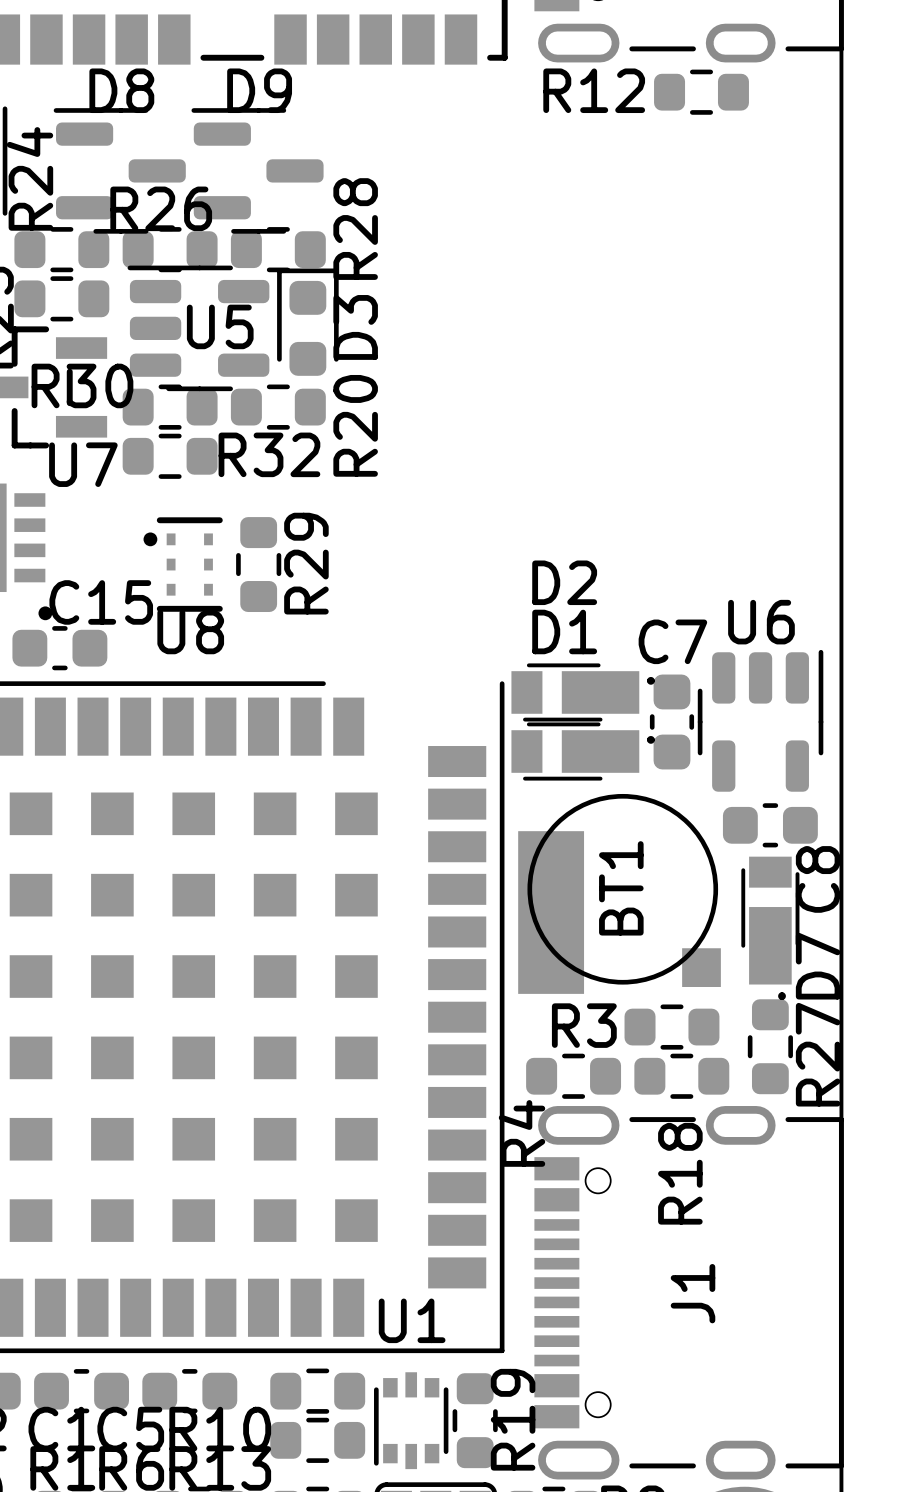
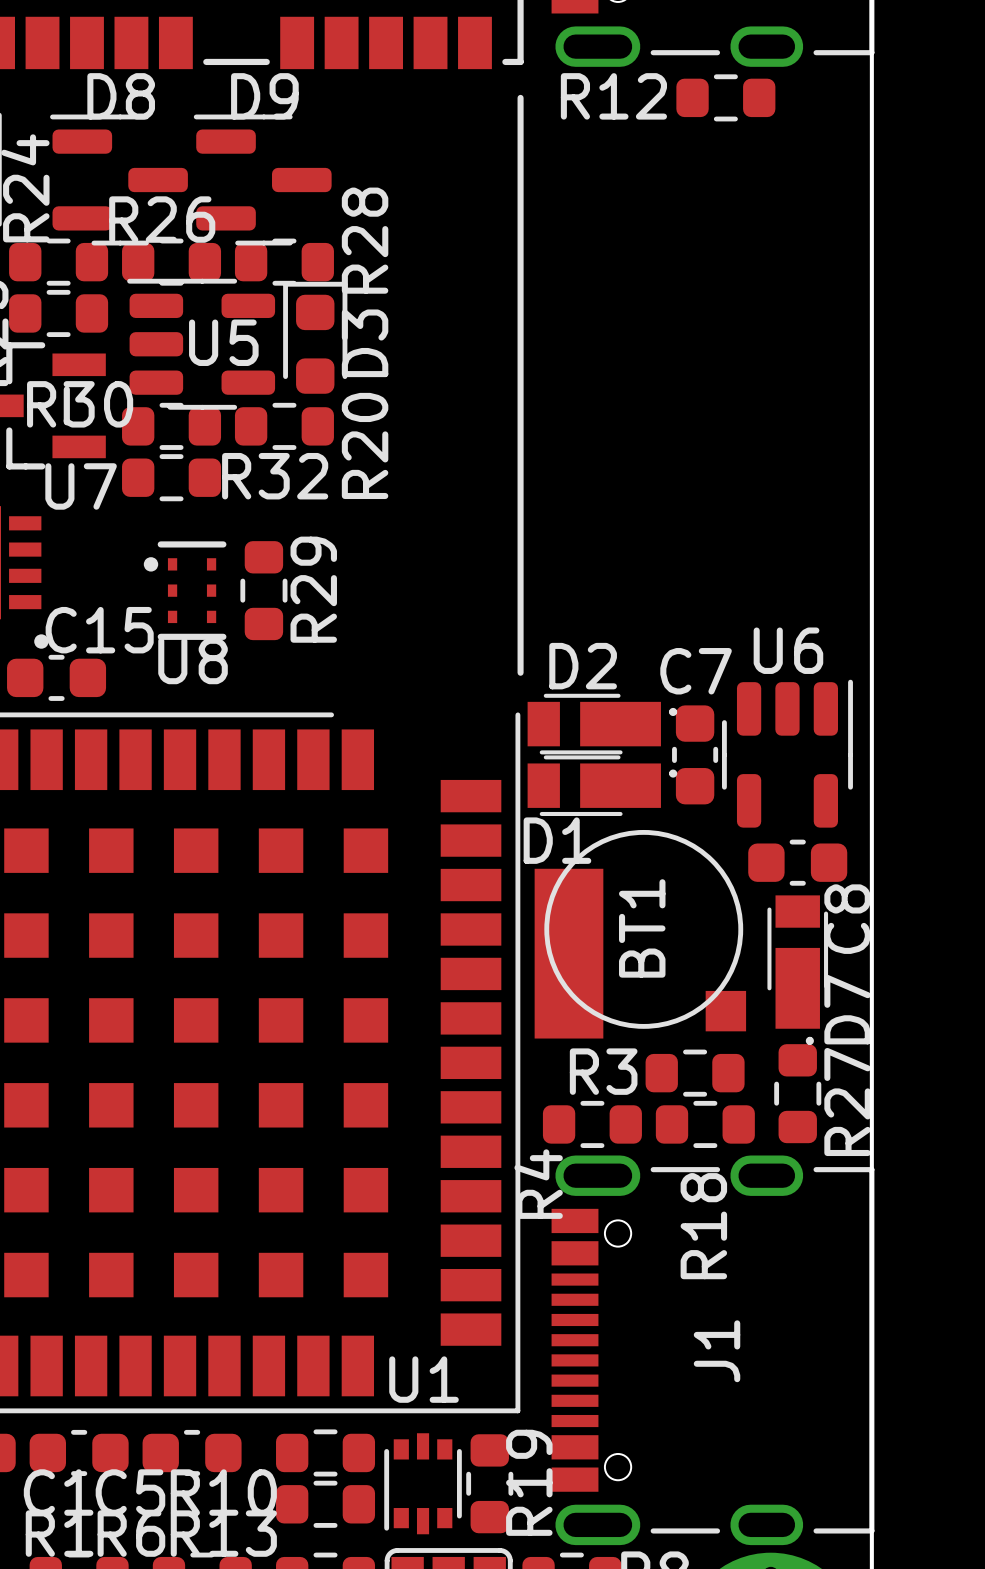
line: none -> (520, 97) (520, 672)
D2 name position: D2 (564, 582) -> D2 (583, 666)
D1 name position: D1 (564, 631) -> D1 (557, 840)

